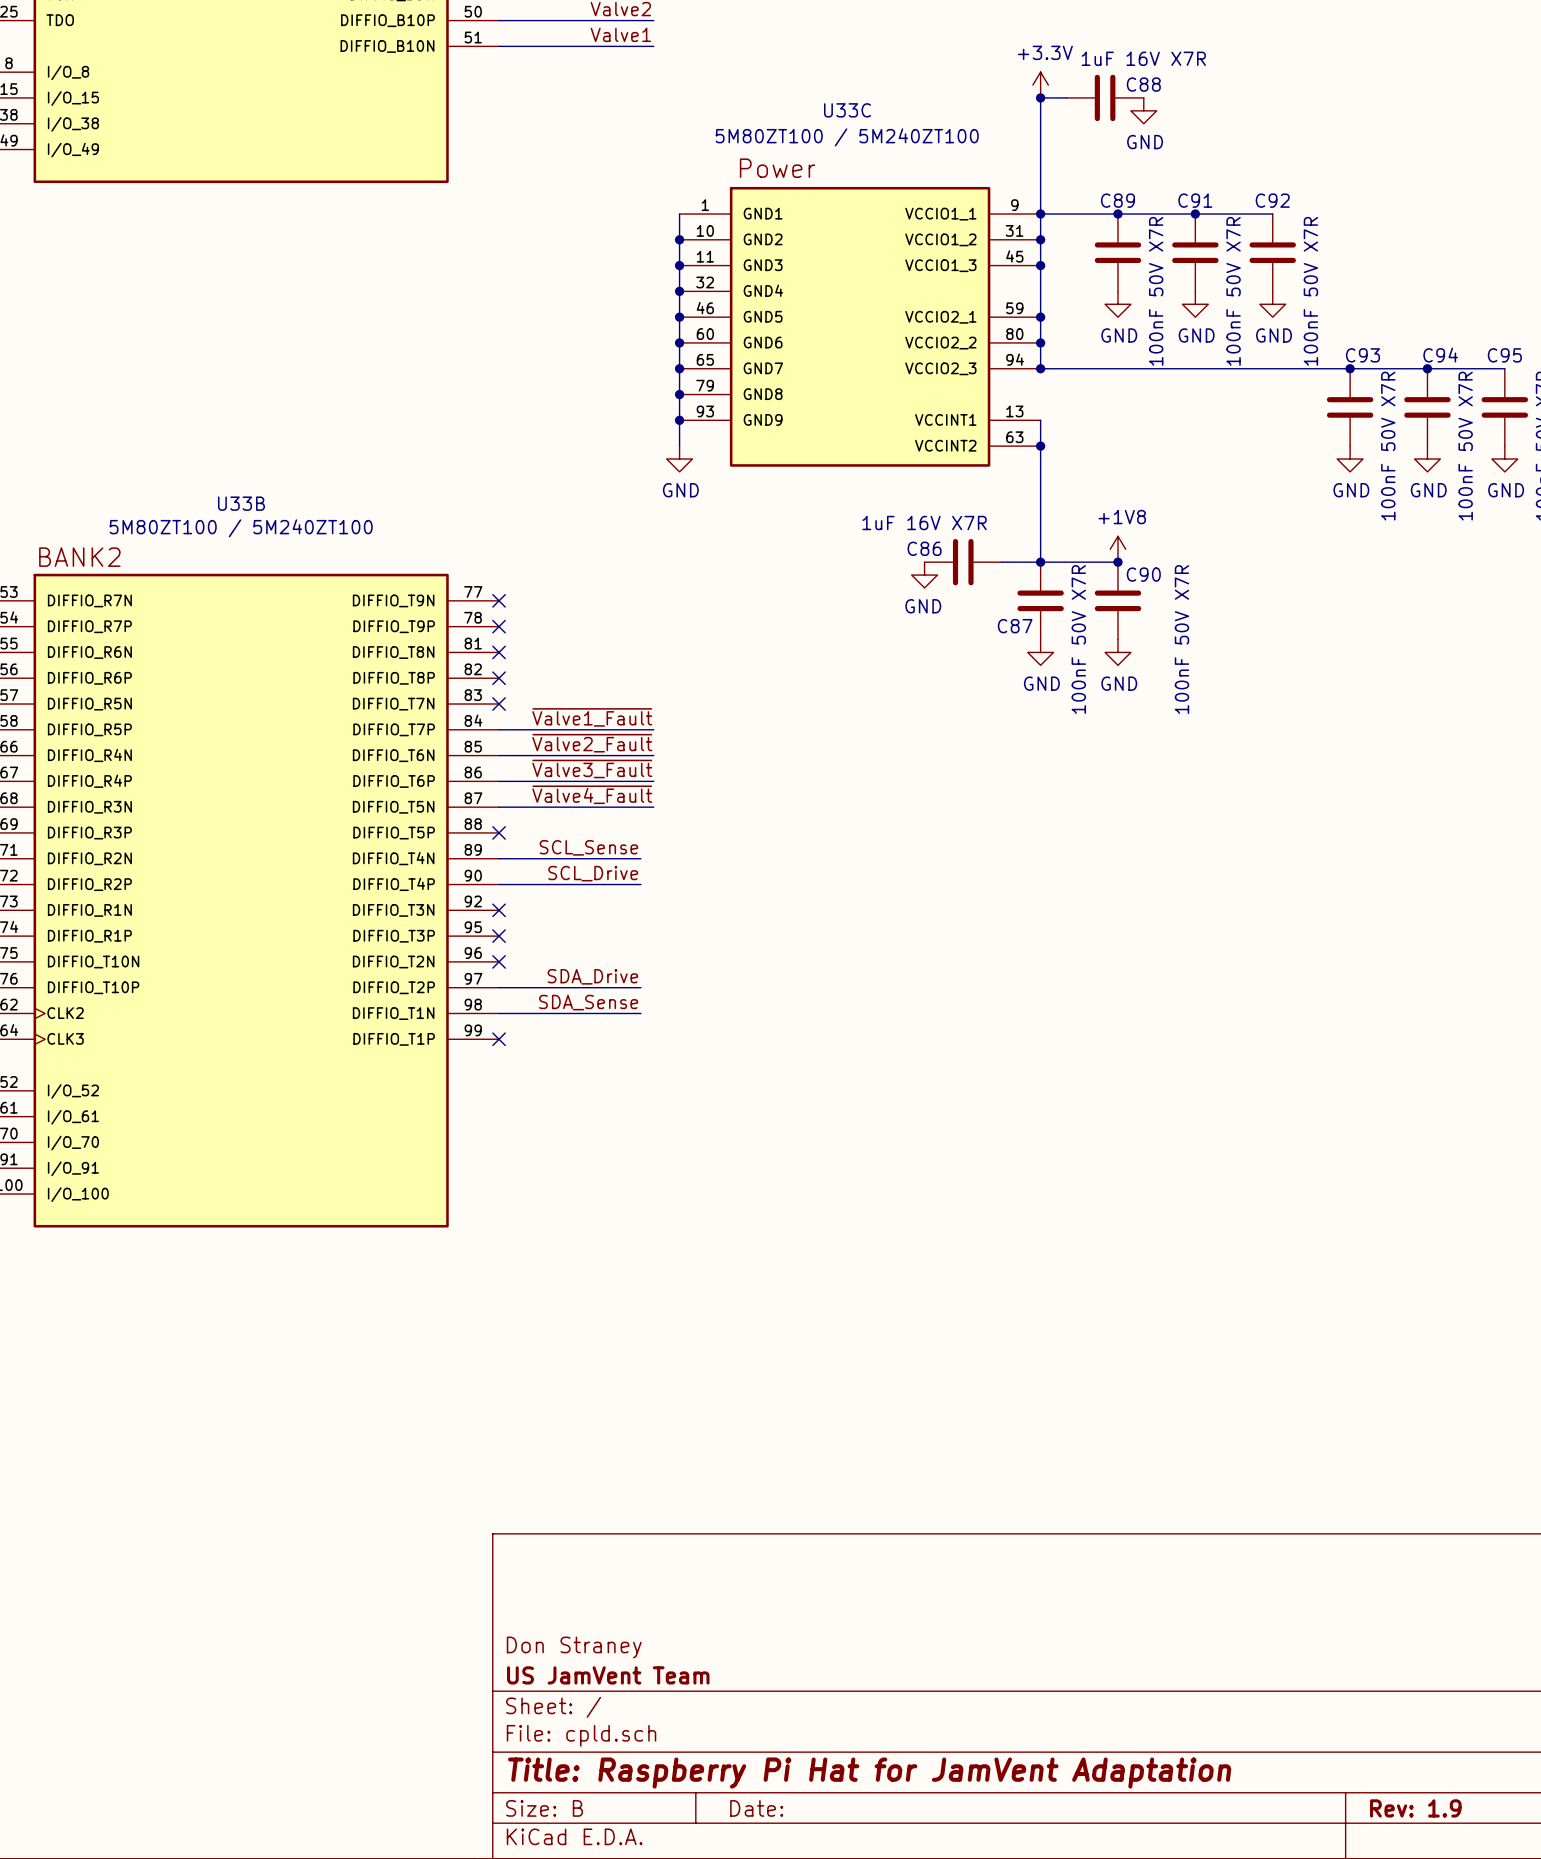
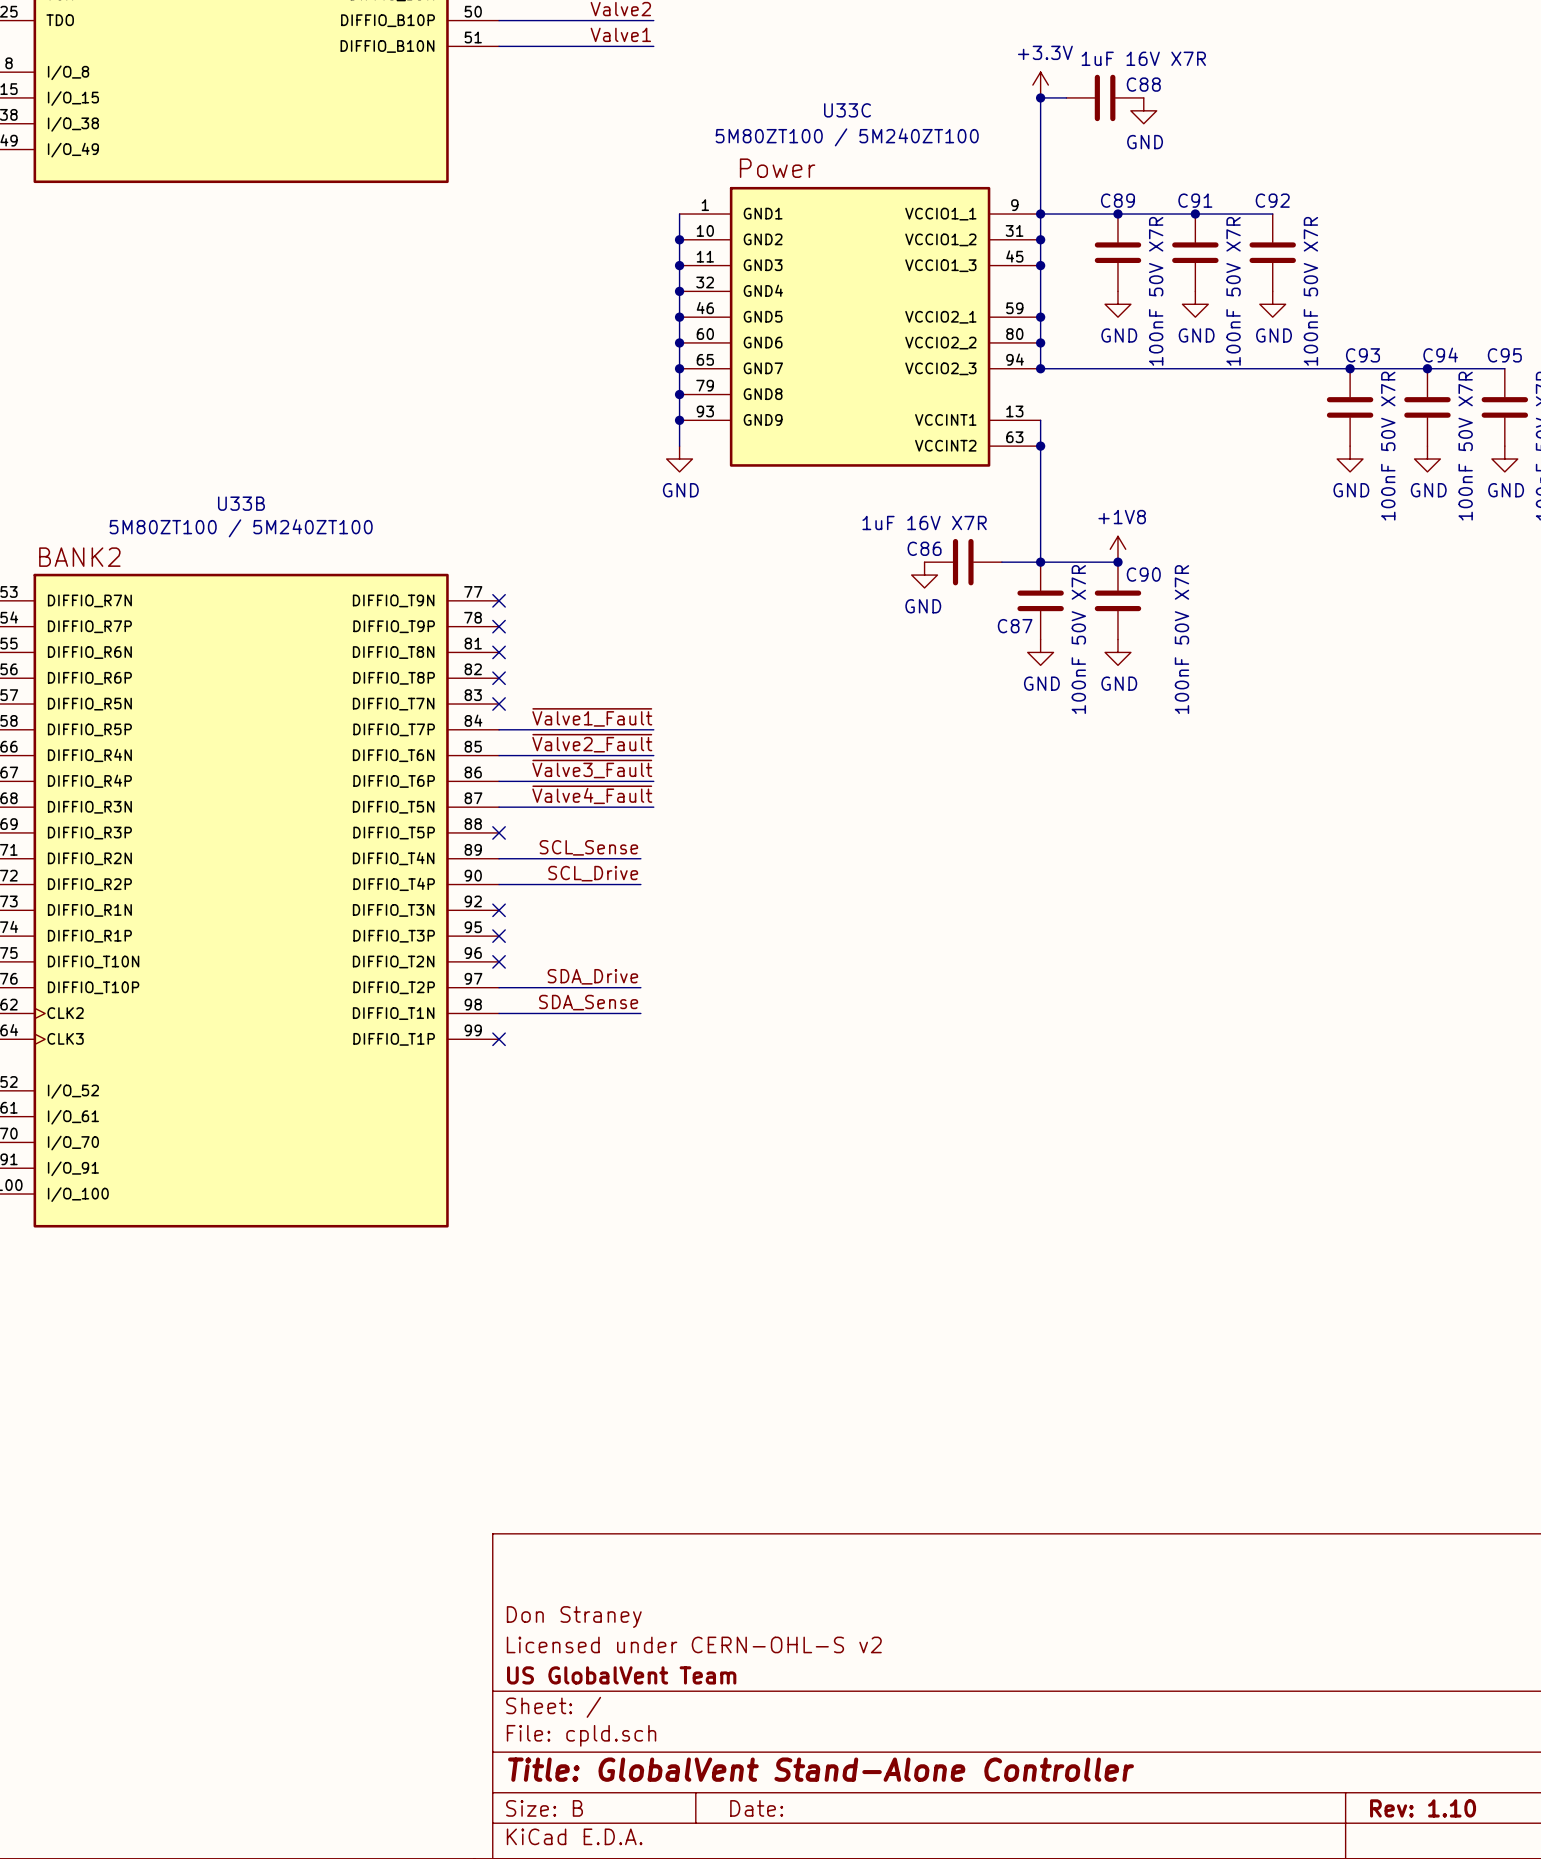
title block: none -> Don Straney (574, 1617)
title block: Don Straney (574, 1647) -> Licensed under CERN-OHL-S v2 (694, 1644)
title block: US JamVent Team (608, 1675) -> US GlobalVent Team (621, 1675)
title block: Title: Raspberry Pi Hat for JamVent Adaptation (869, 1773) -> Title: GlobalVent Stand-Alone Controller (820, 1769)
title block: Rev: 1.9 (1415, 1808) -> Rev: 1.10 (1423, 1808)

